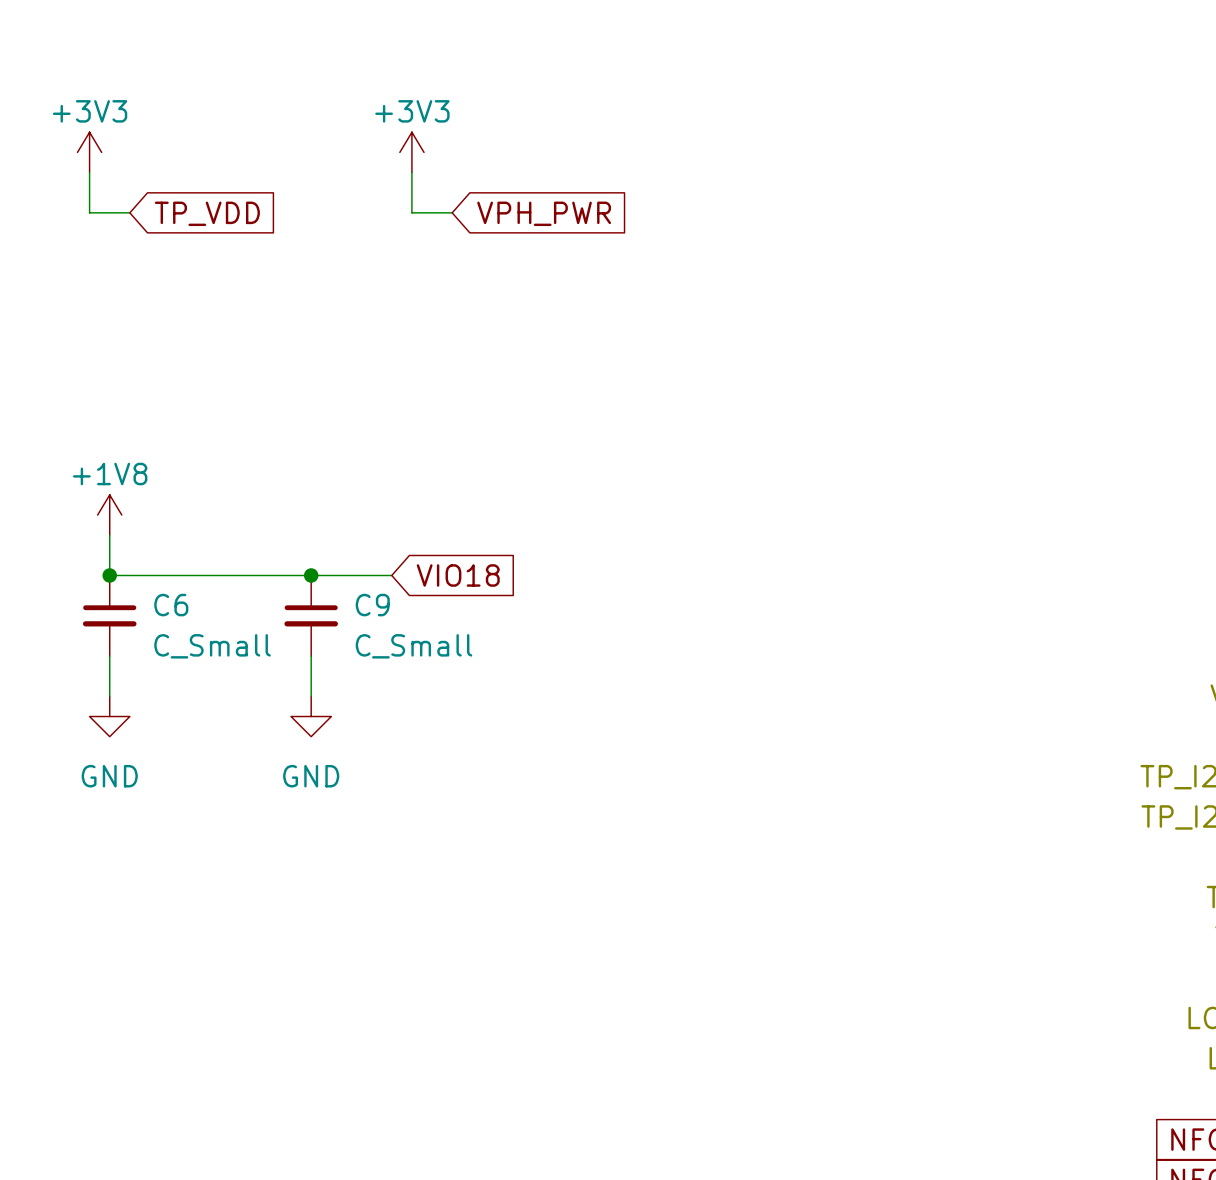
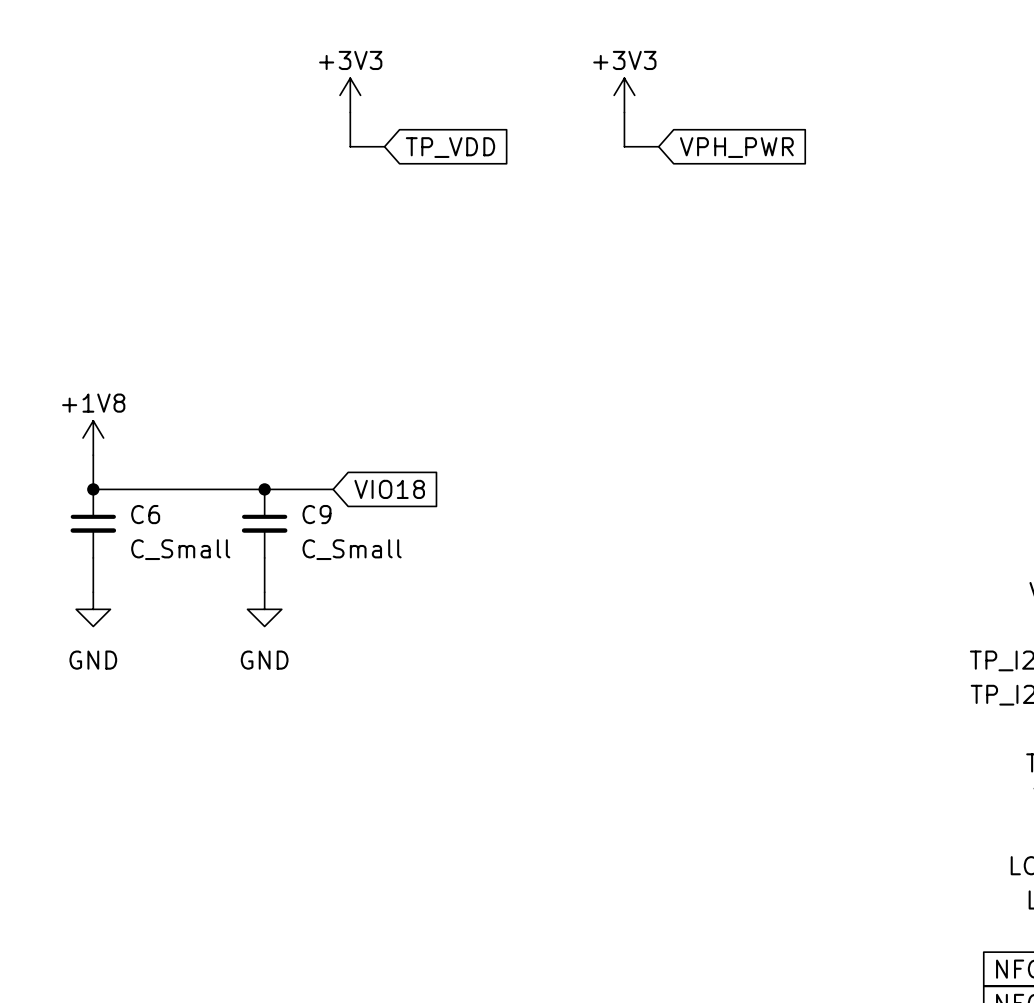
power symbol: none -> +3V3 (624, 95)
power symbol: +3V3 (89, 152) -> none
power symbol position: +3V3 (411, 152) -> +3V3 (350, 95)
wire: (89, 172) (89, 212) (129, 212) -> (350, 112) (350, 146) (384, 146)
wire: (411, 172) (411, 212) (452, 212) -> (624, 112) (624, 146) (658, 146)
global label position: TP_VDD (207, 213) -> TP_VDD (450, 147)
global label position: VPH_PWR (544, 213) -> VPH_PWR (736, 147)

